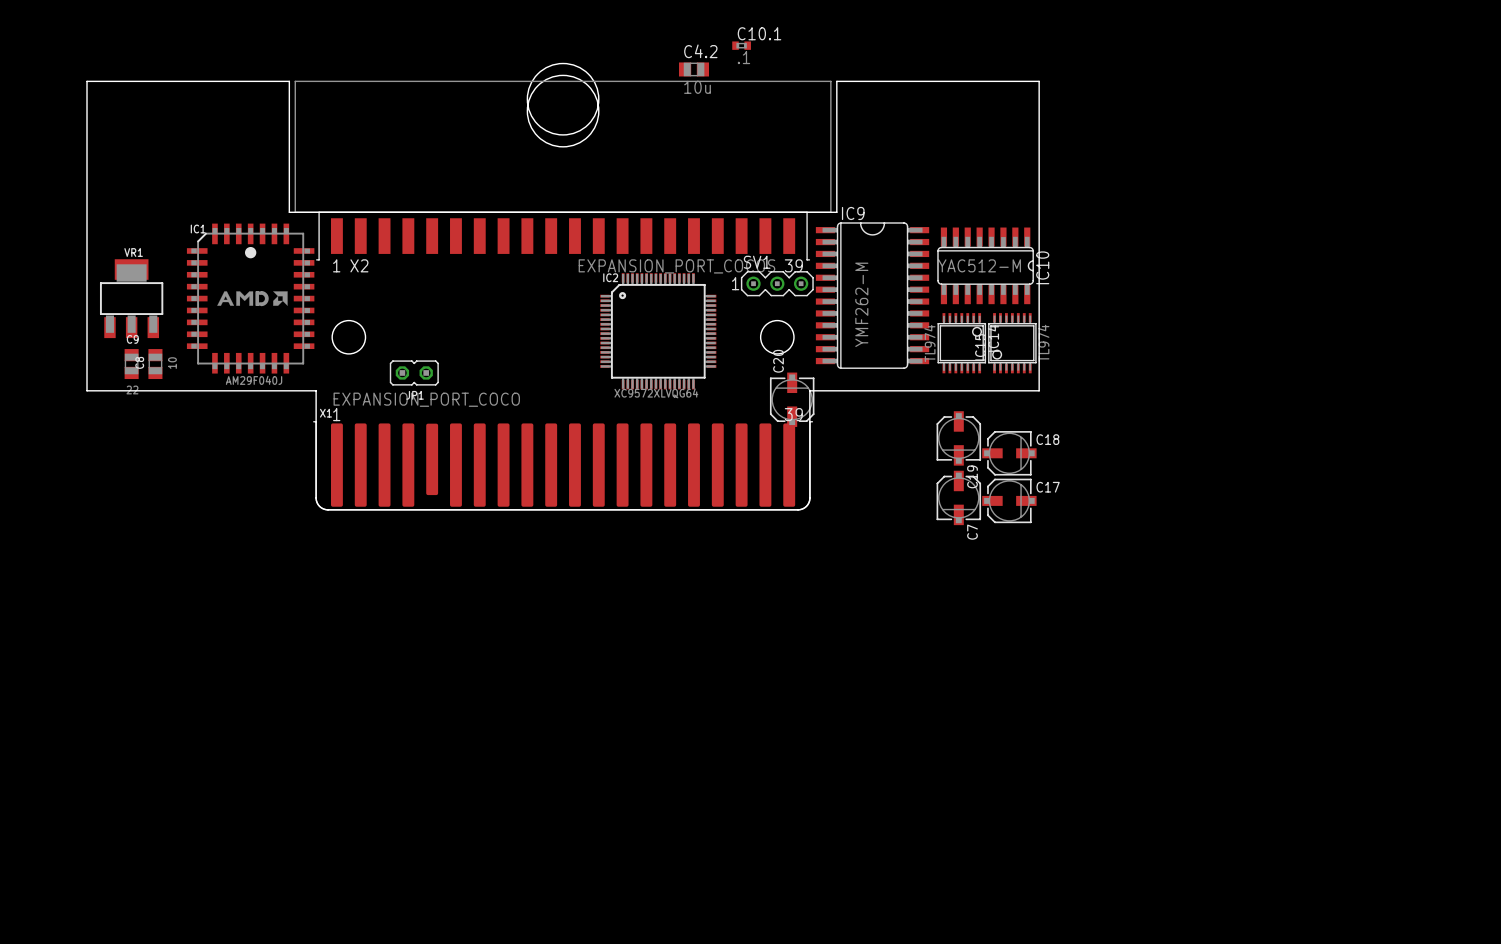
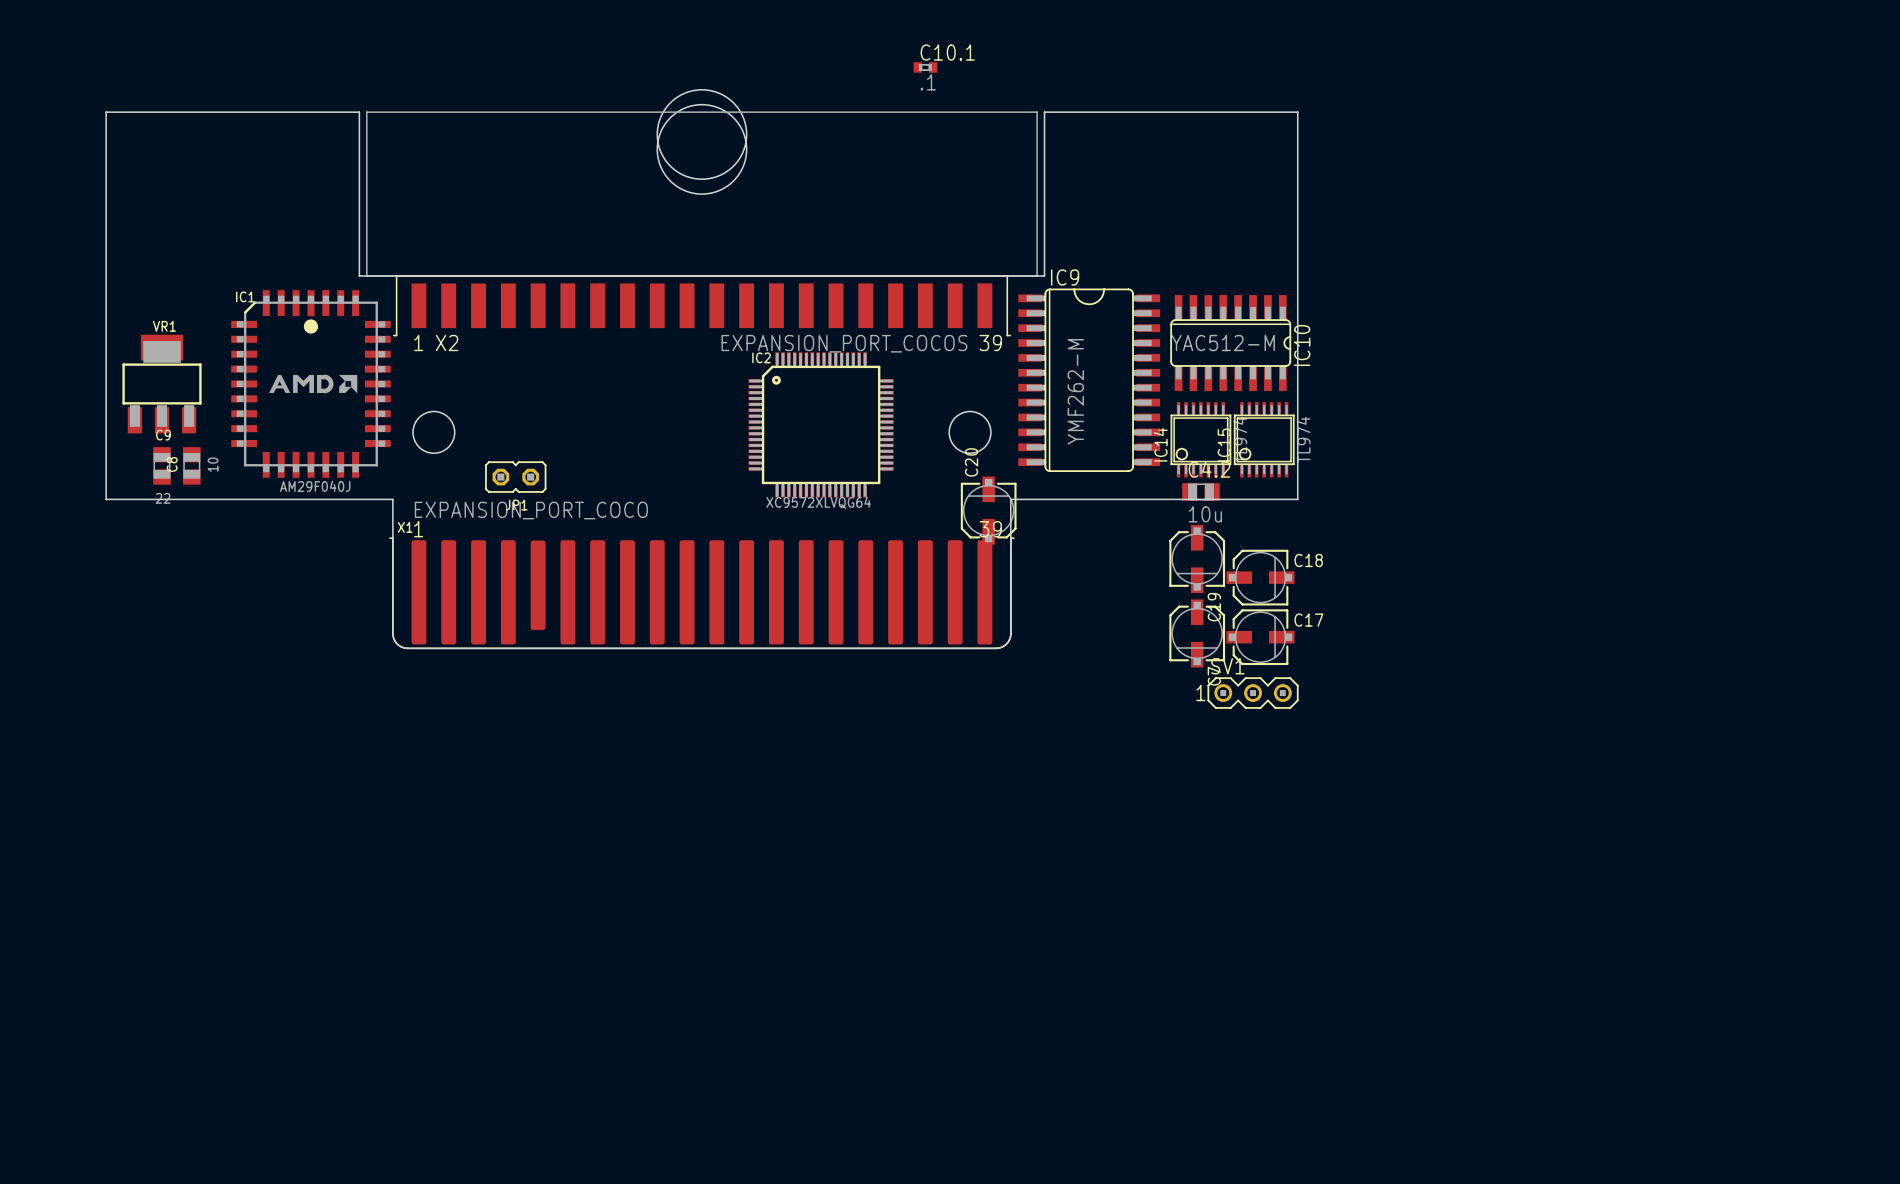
C4.2 position: (694, 69) -> (1200, 491)
SV1 position: (777, 283) -> (1253, 693)
IC14 rotation: 0° (961, 343) -> 180° (1200, 439)

